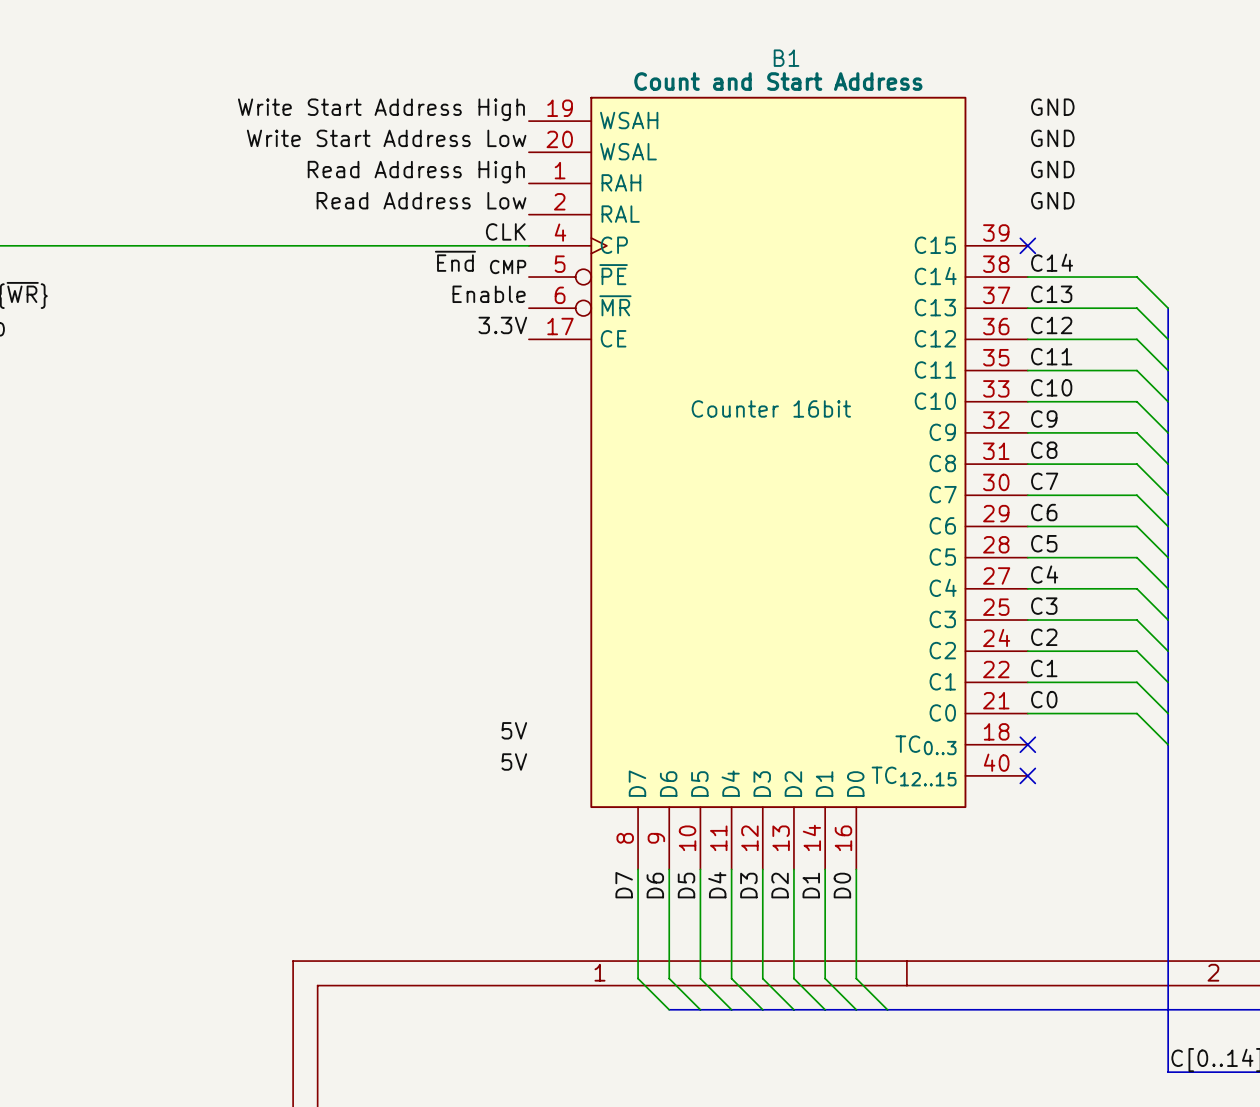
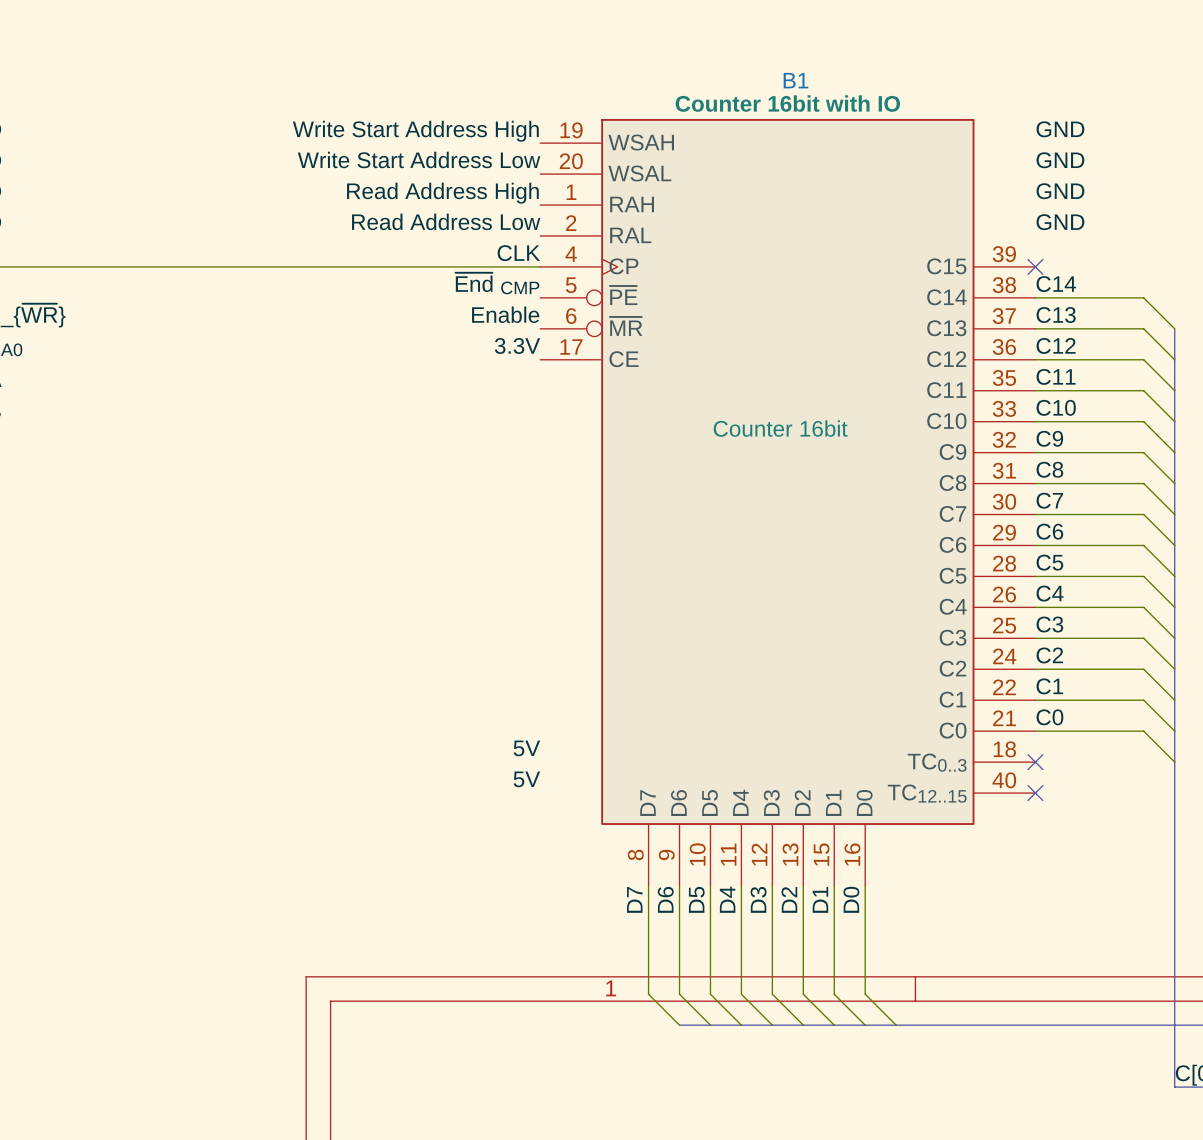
B1 value: Count and Start Address (778, 81) -> Counter 16bit with IO (787, 103)
B1 pin number: 27 (996, 575) -> 26 (1004, 594)
B1 pin number: 14 (811, 837) -> 15 (821, 854)

